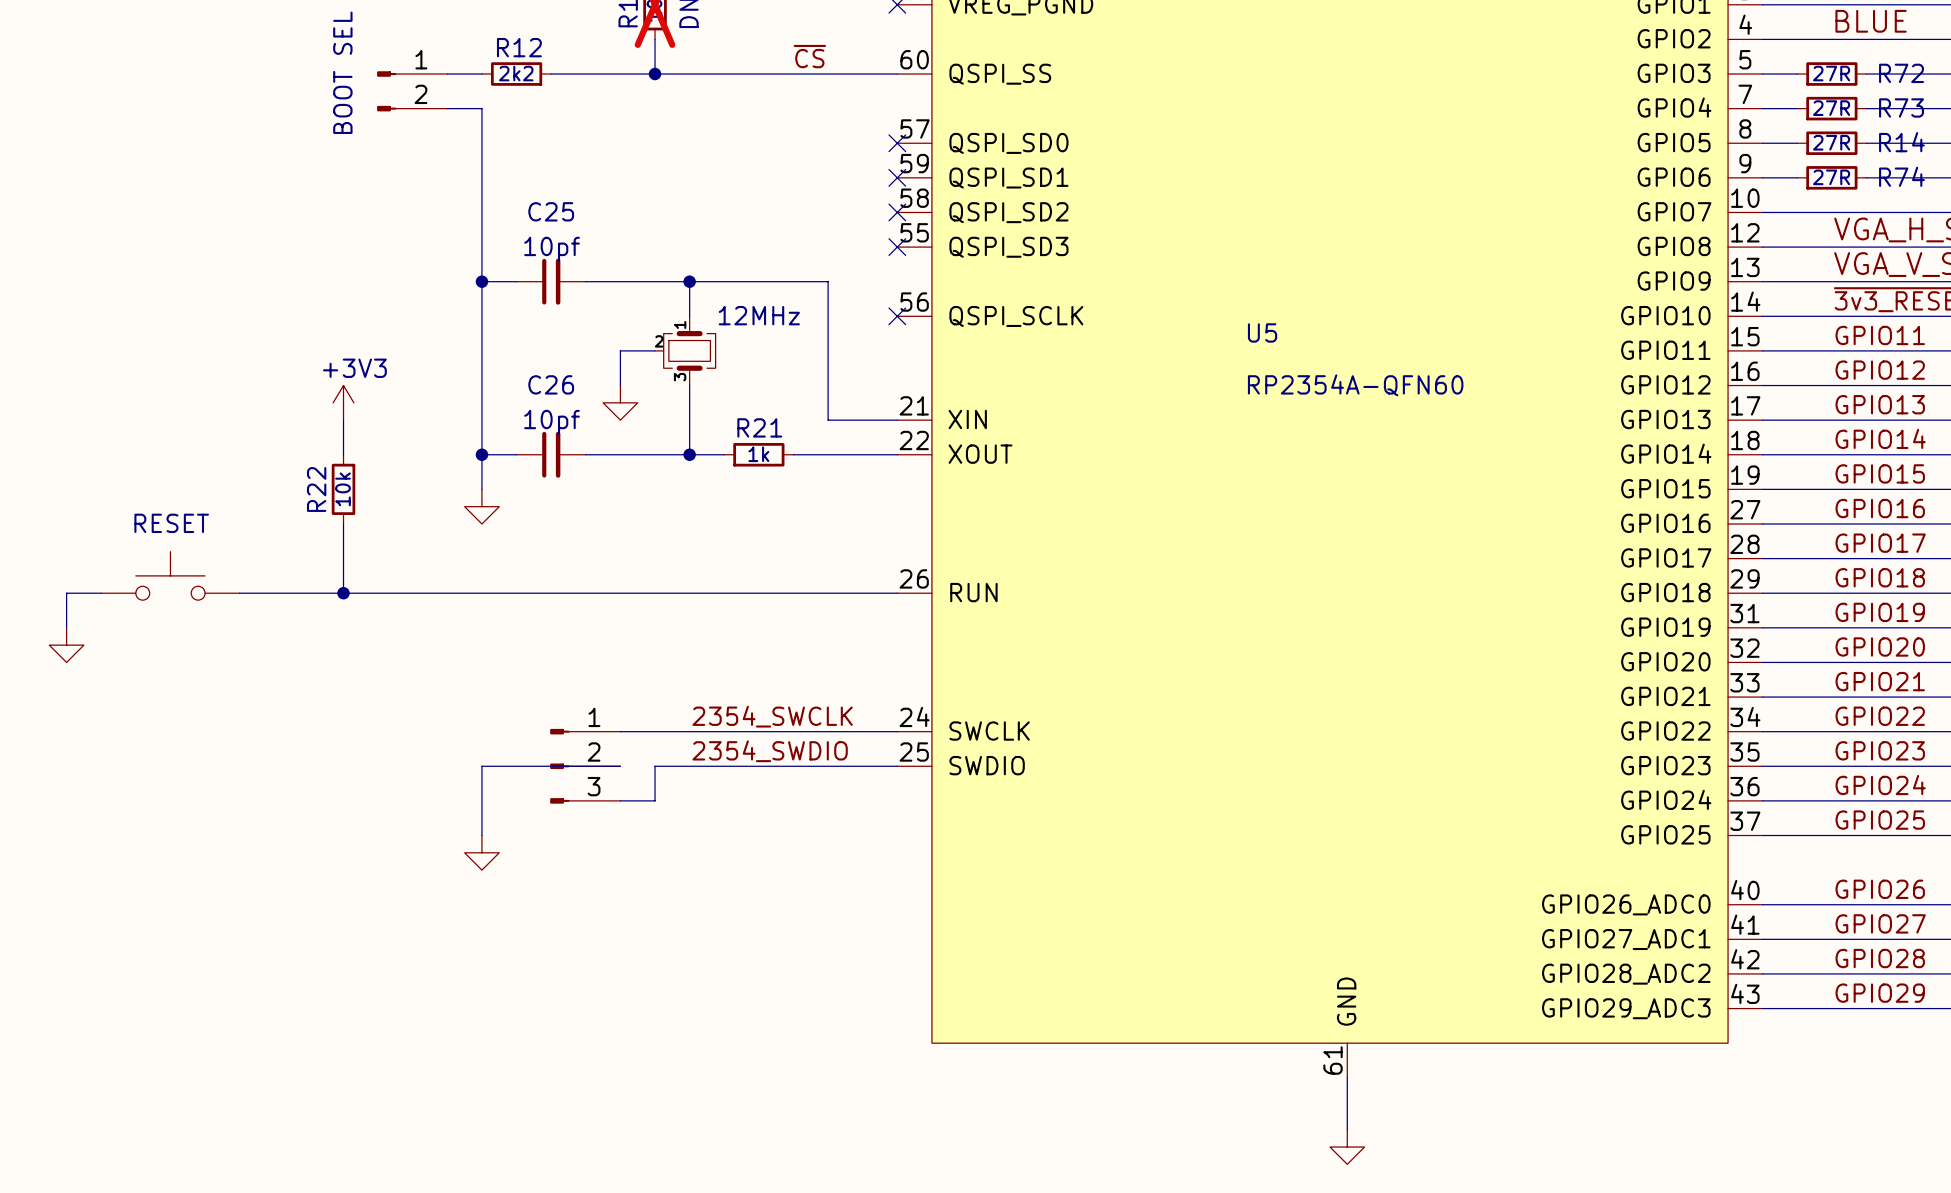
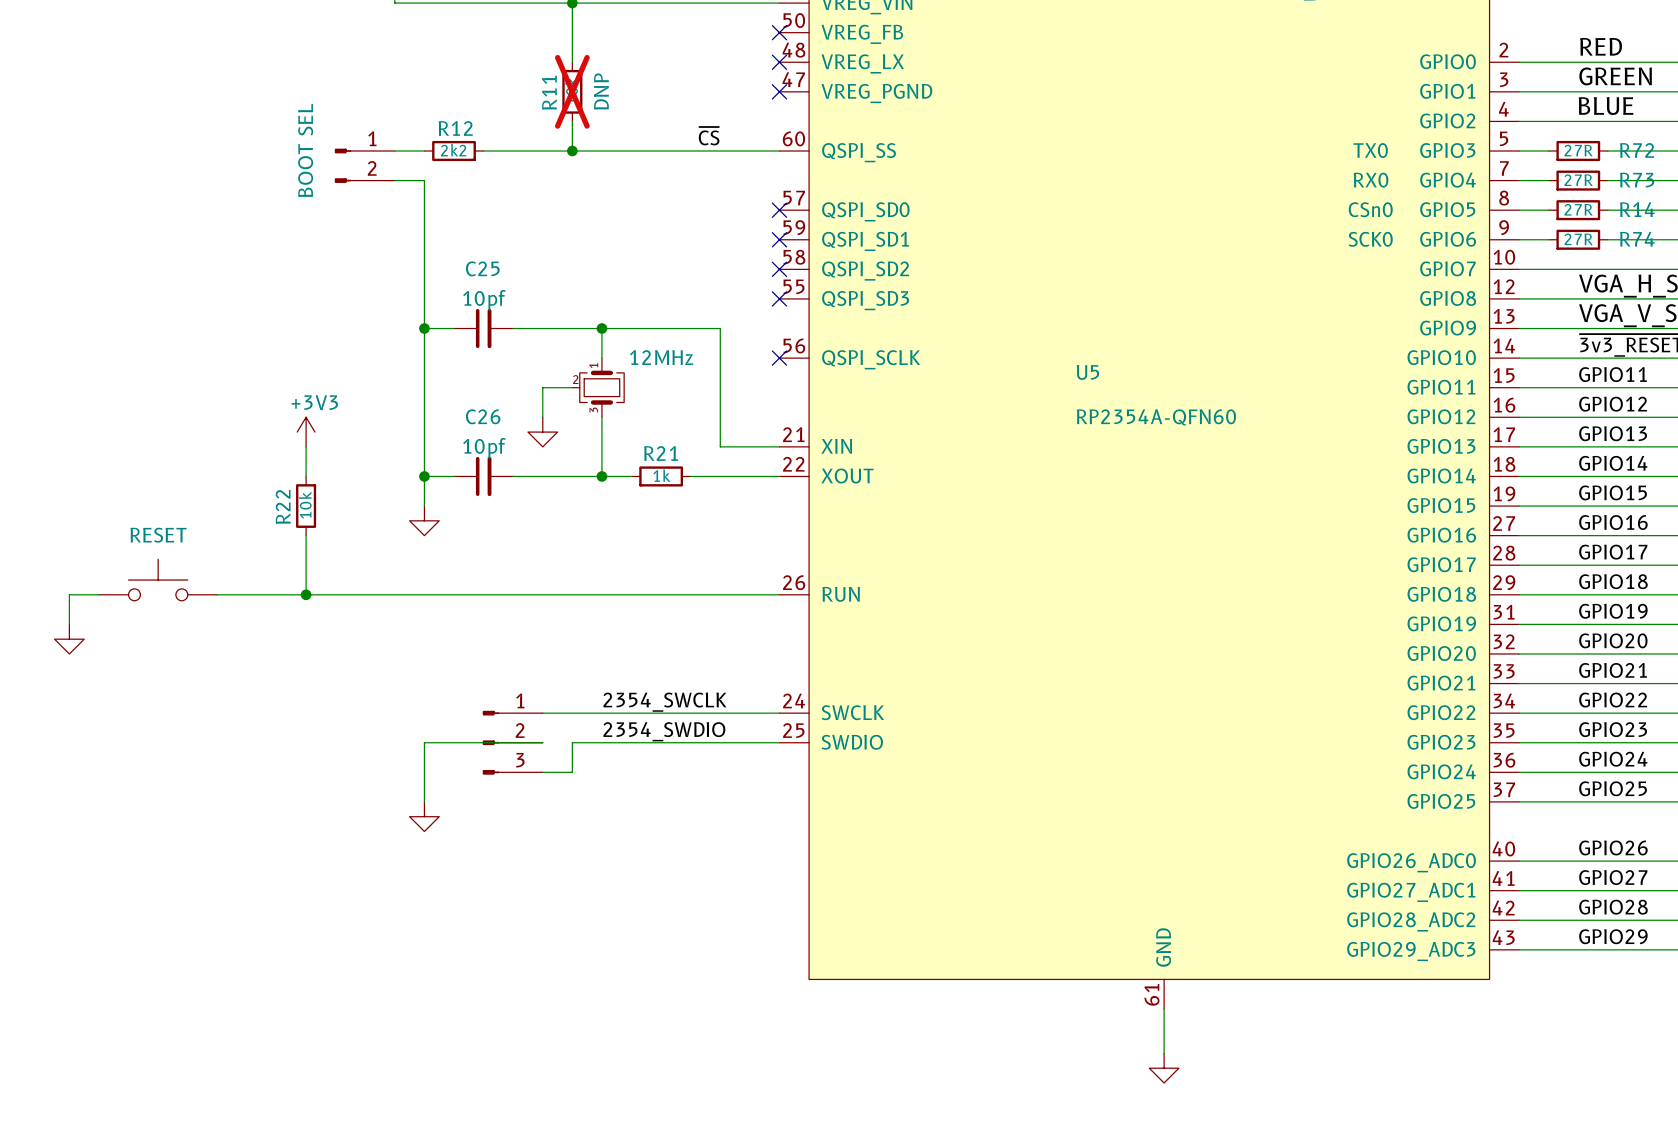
R72 text: none -> TX0 (1370, 150)
R73 text: none -> RX0 (1371, 180)
R14 text: none -> CSn0 (1370, 209)
R74 text: none -> SCK0 (1370, 239)

